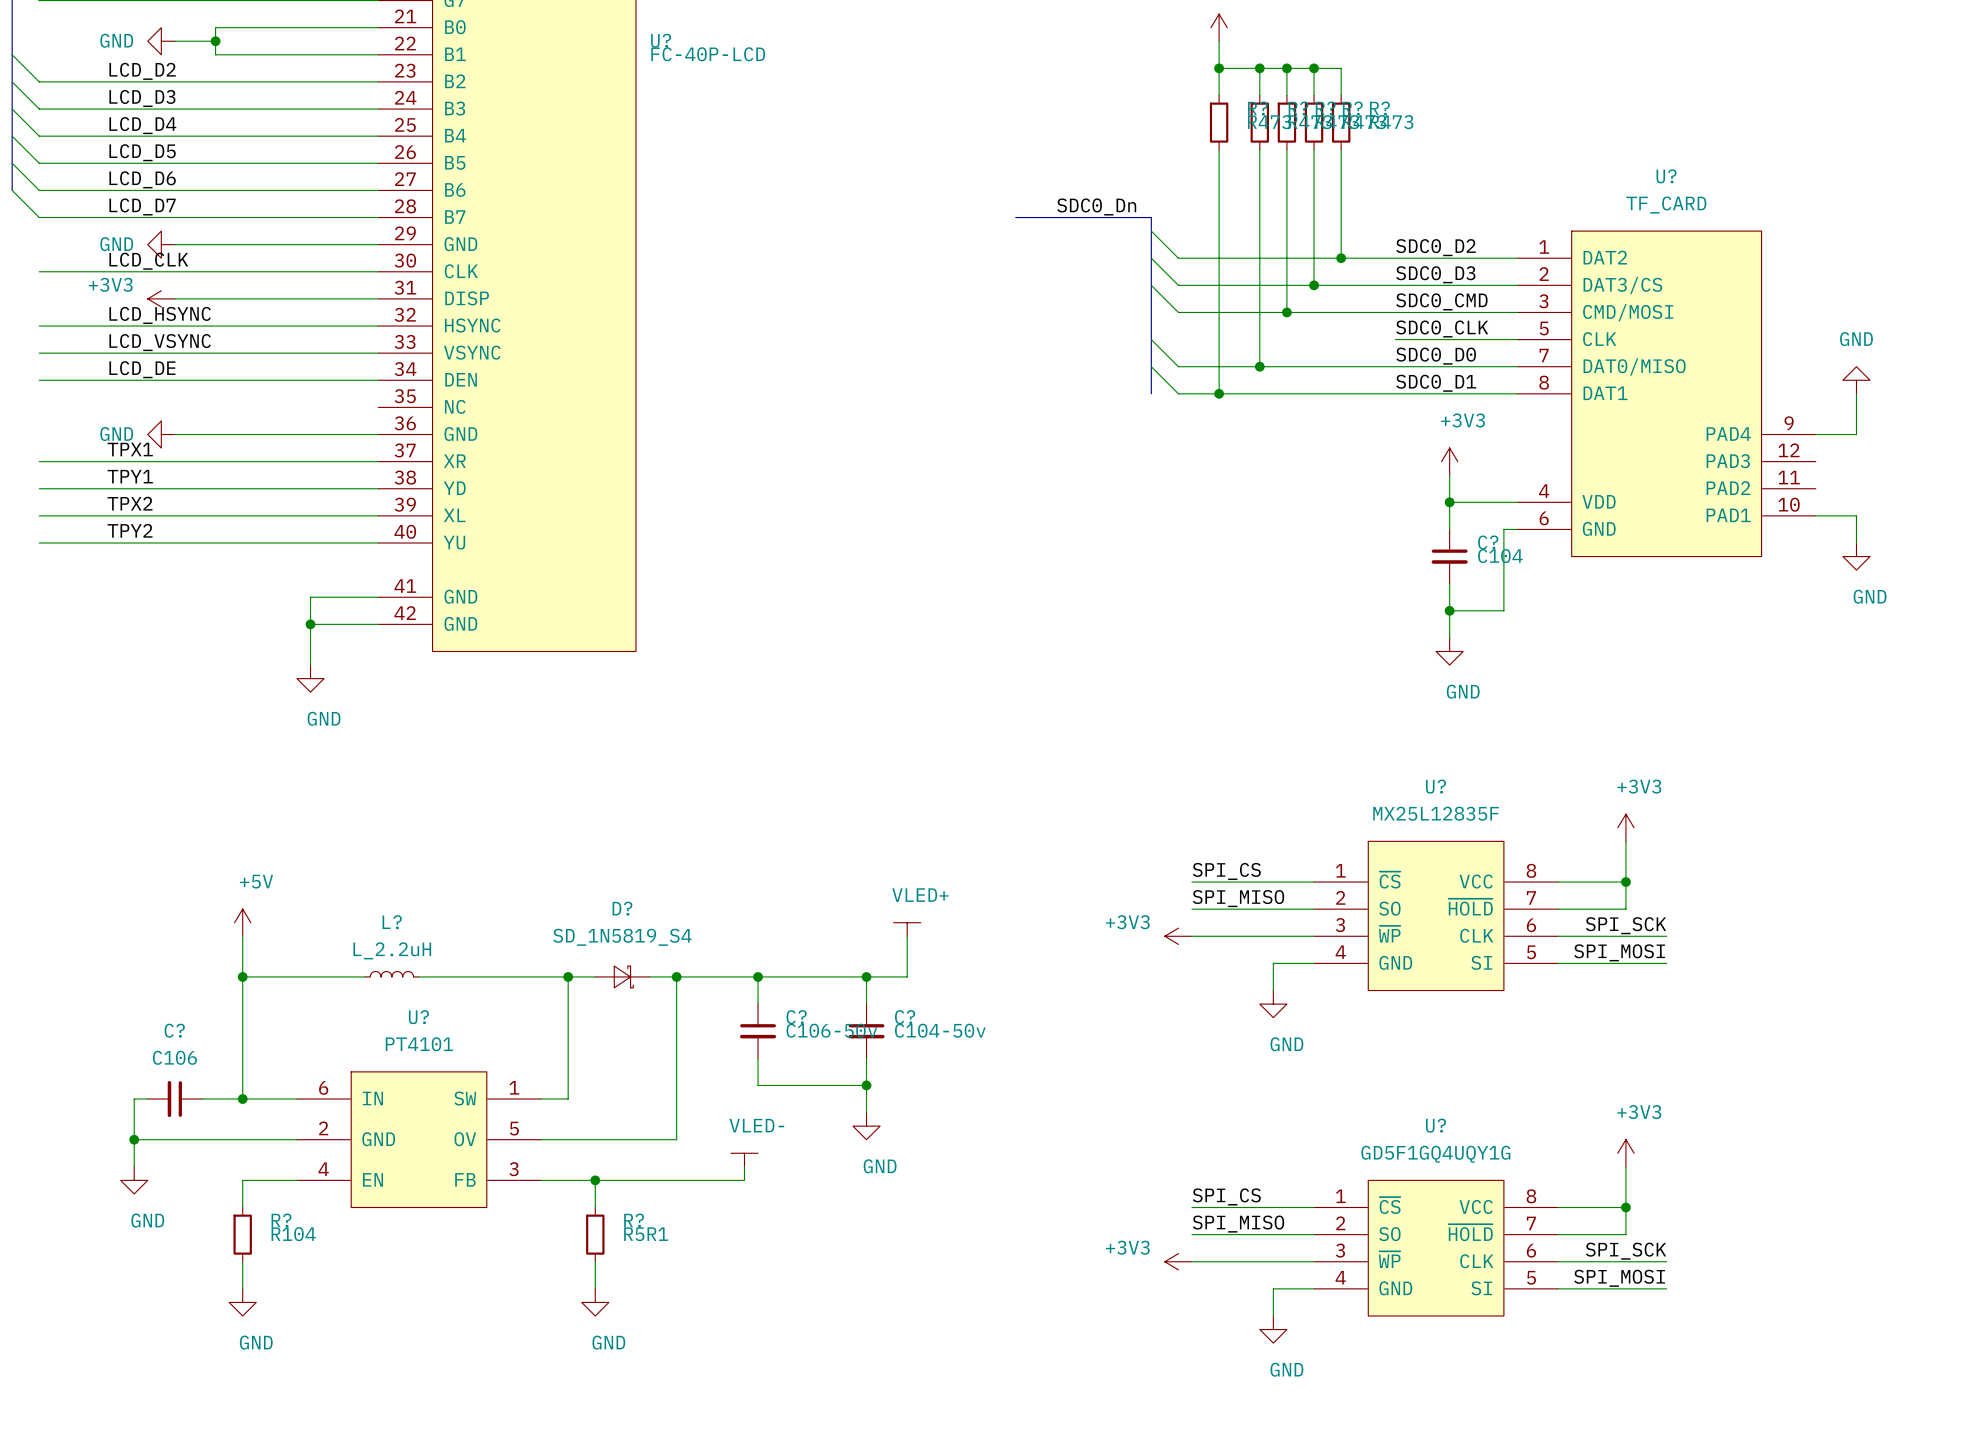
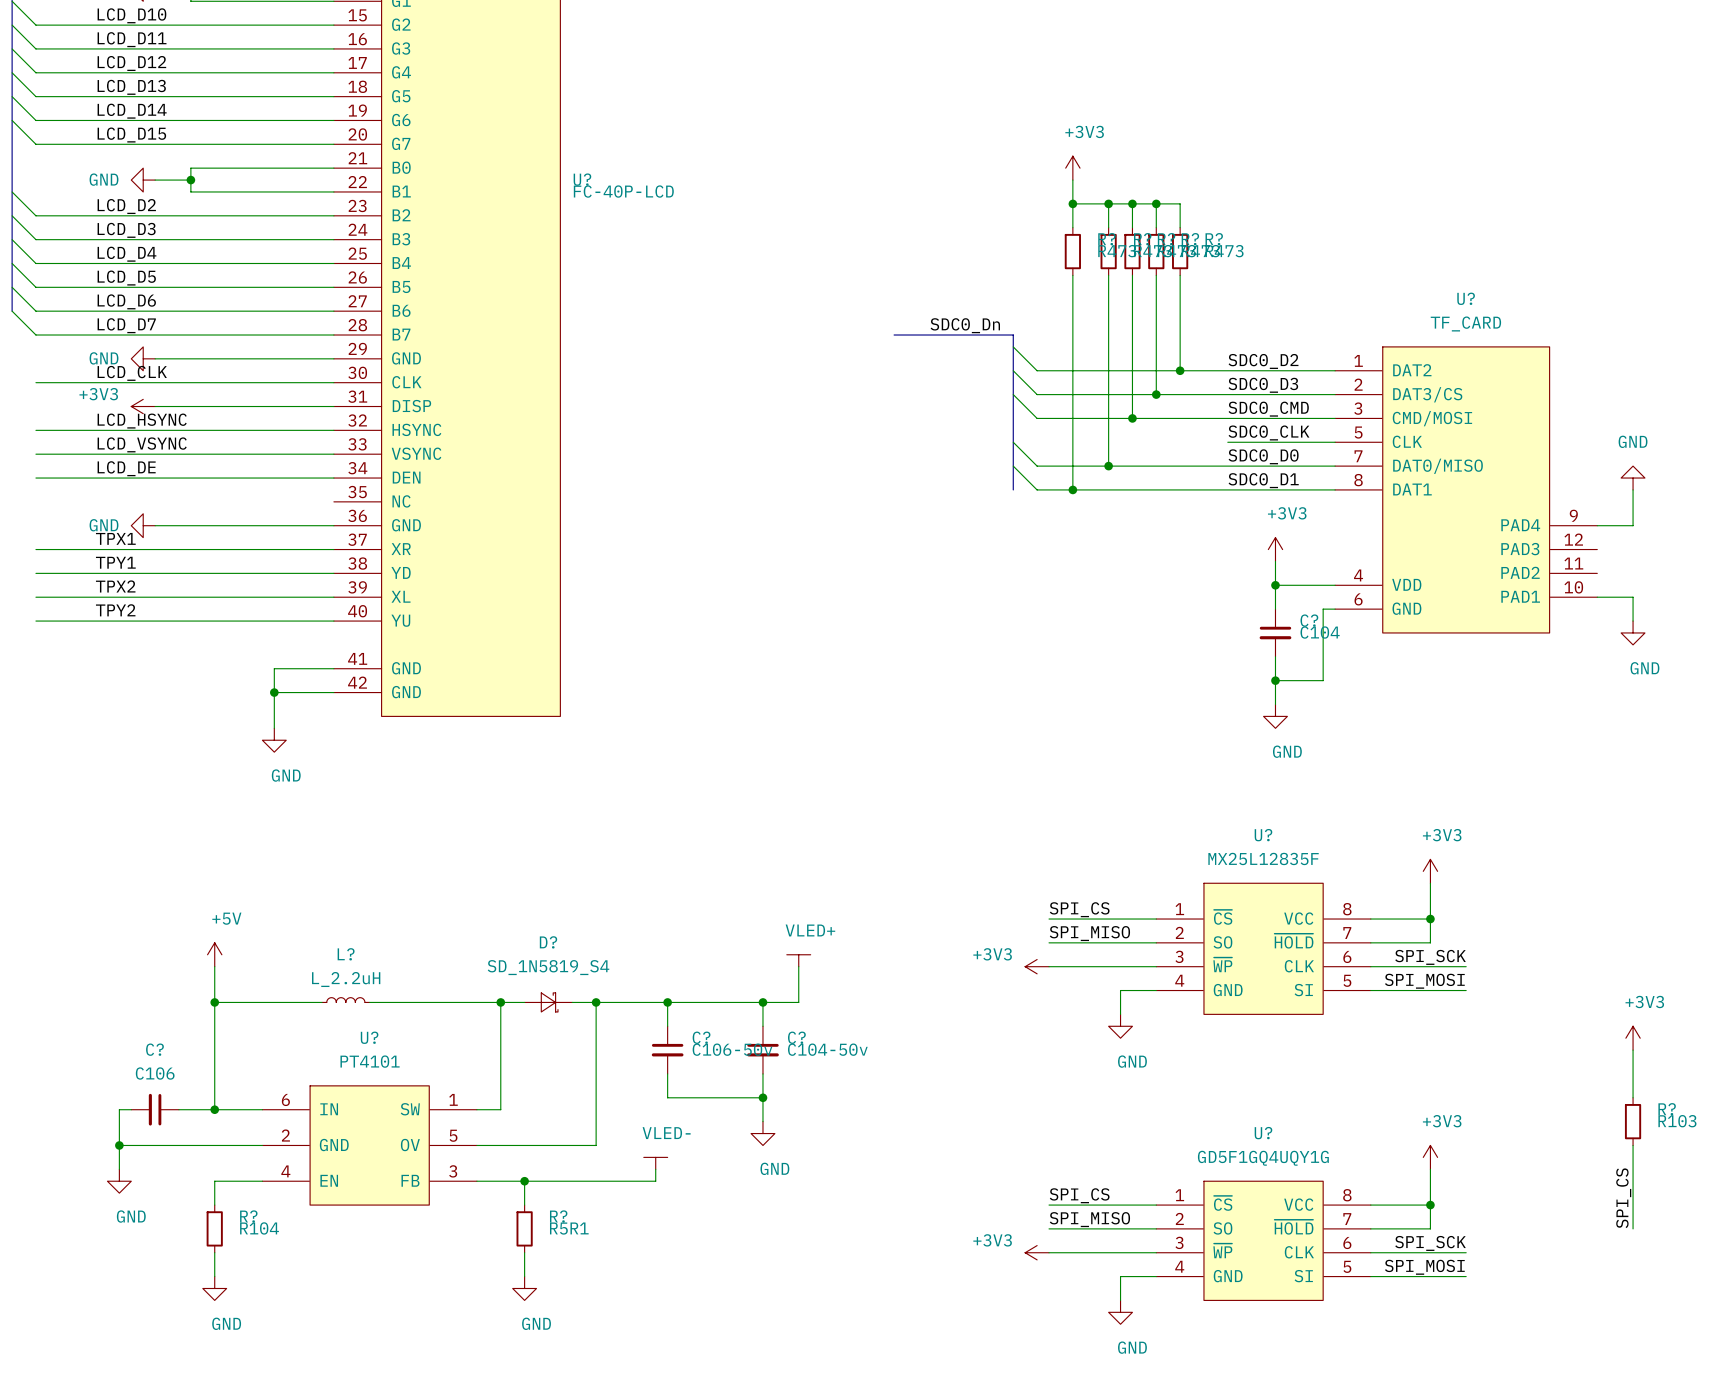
power symbol: none -> +3V3 (1633, 1038)
wire: none -> (1633, 1050) (1633, 1097)
R?: none -> R103 (1633, 1121)
wire: none -> (1633, 1145) (1633, 1228)
label: none -> SPI_CS (1623, 1198)

